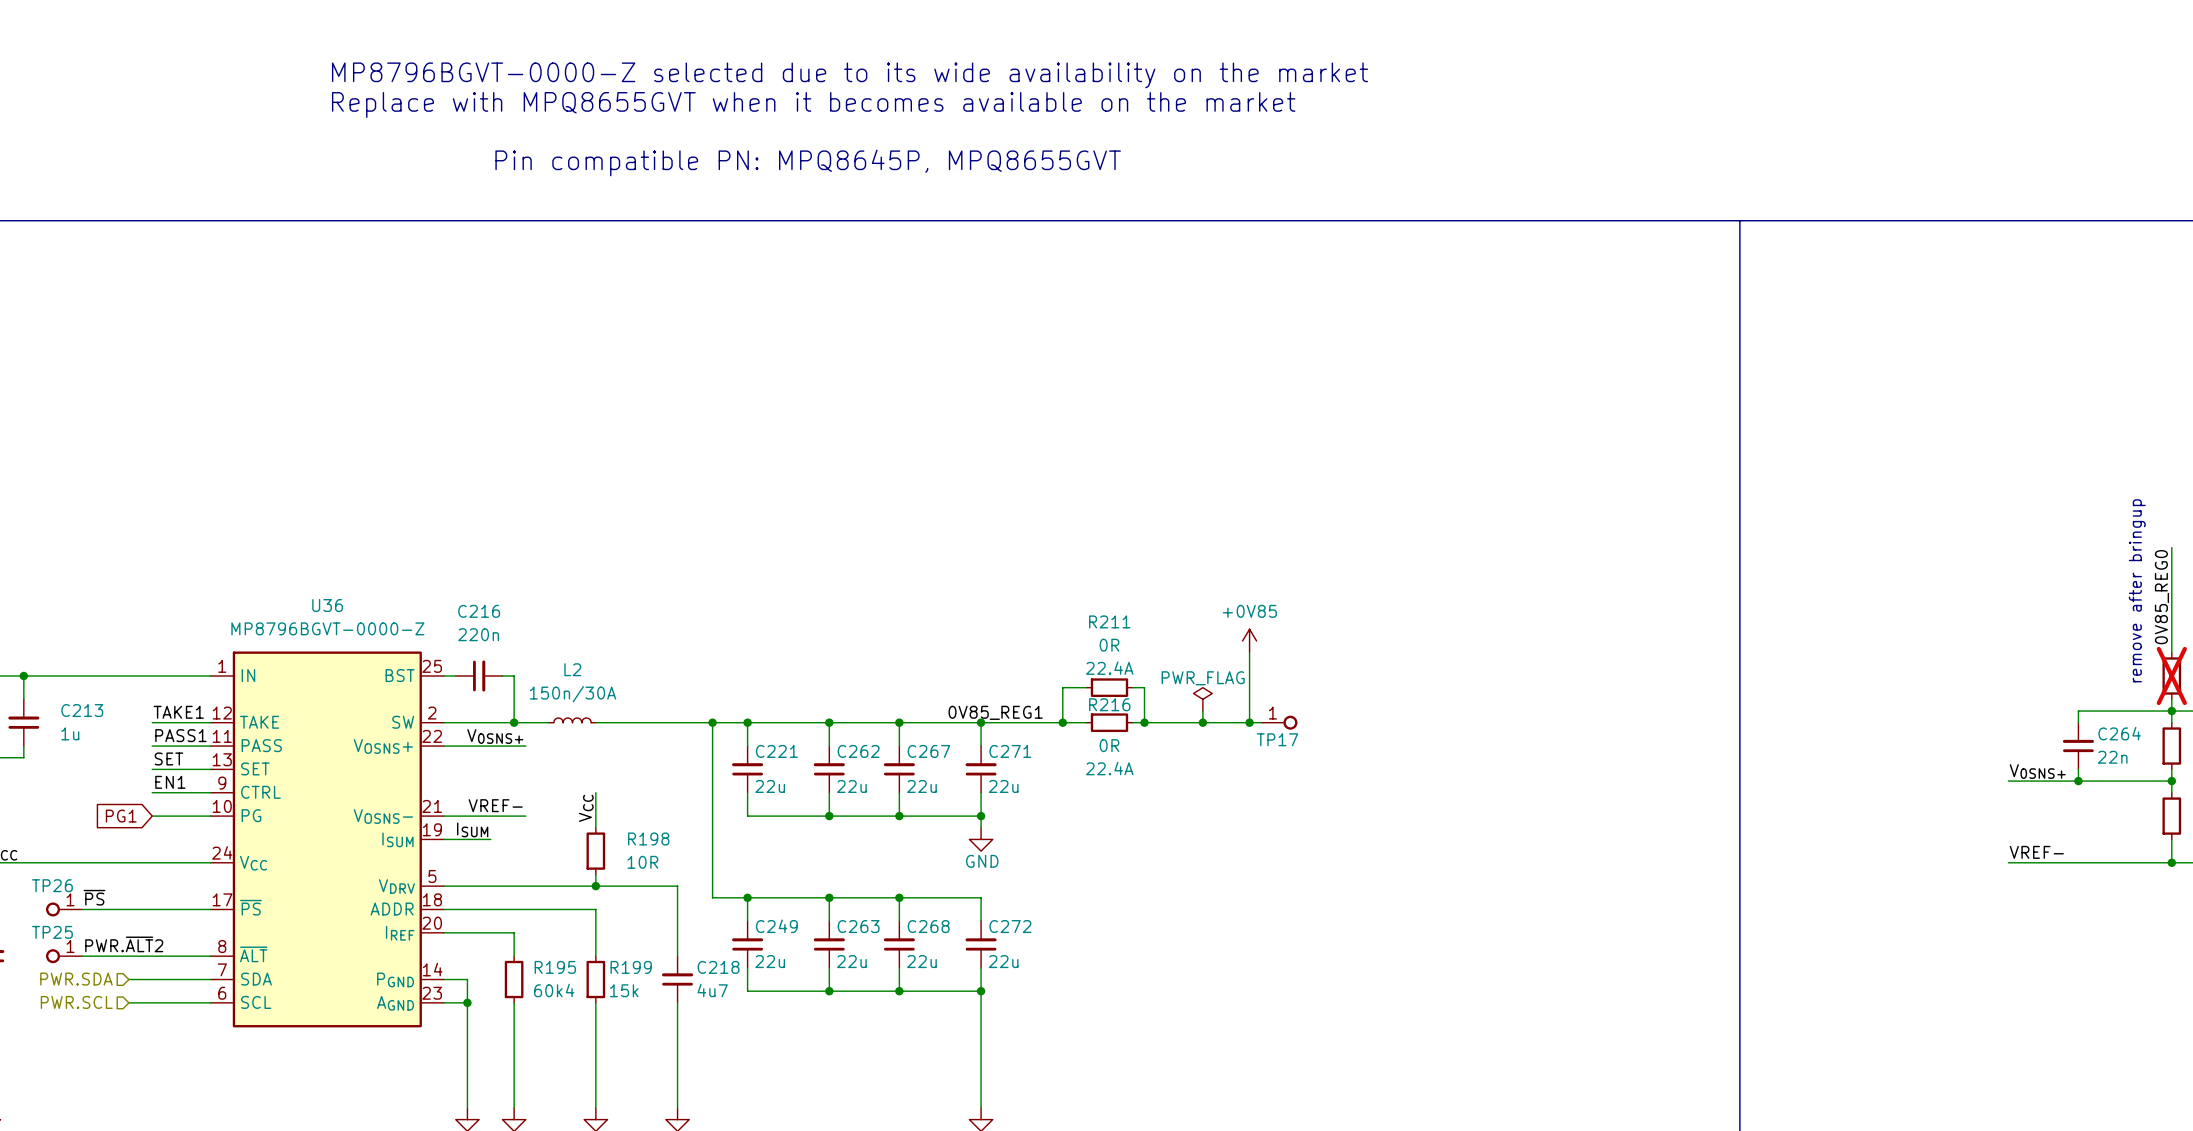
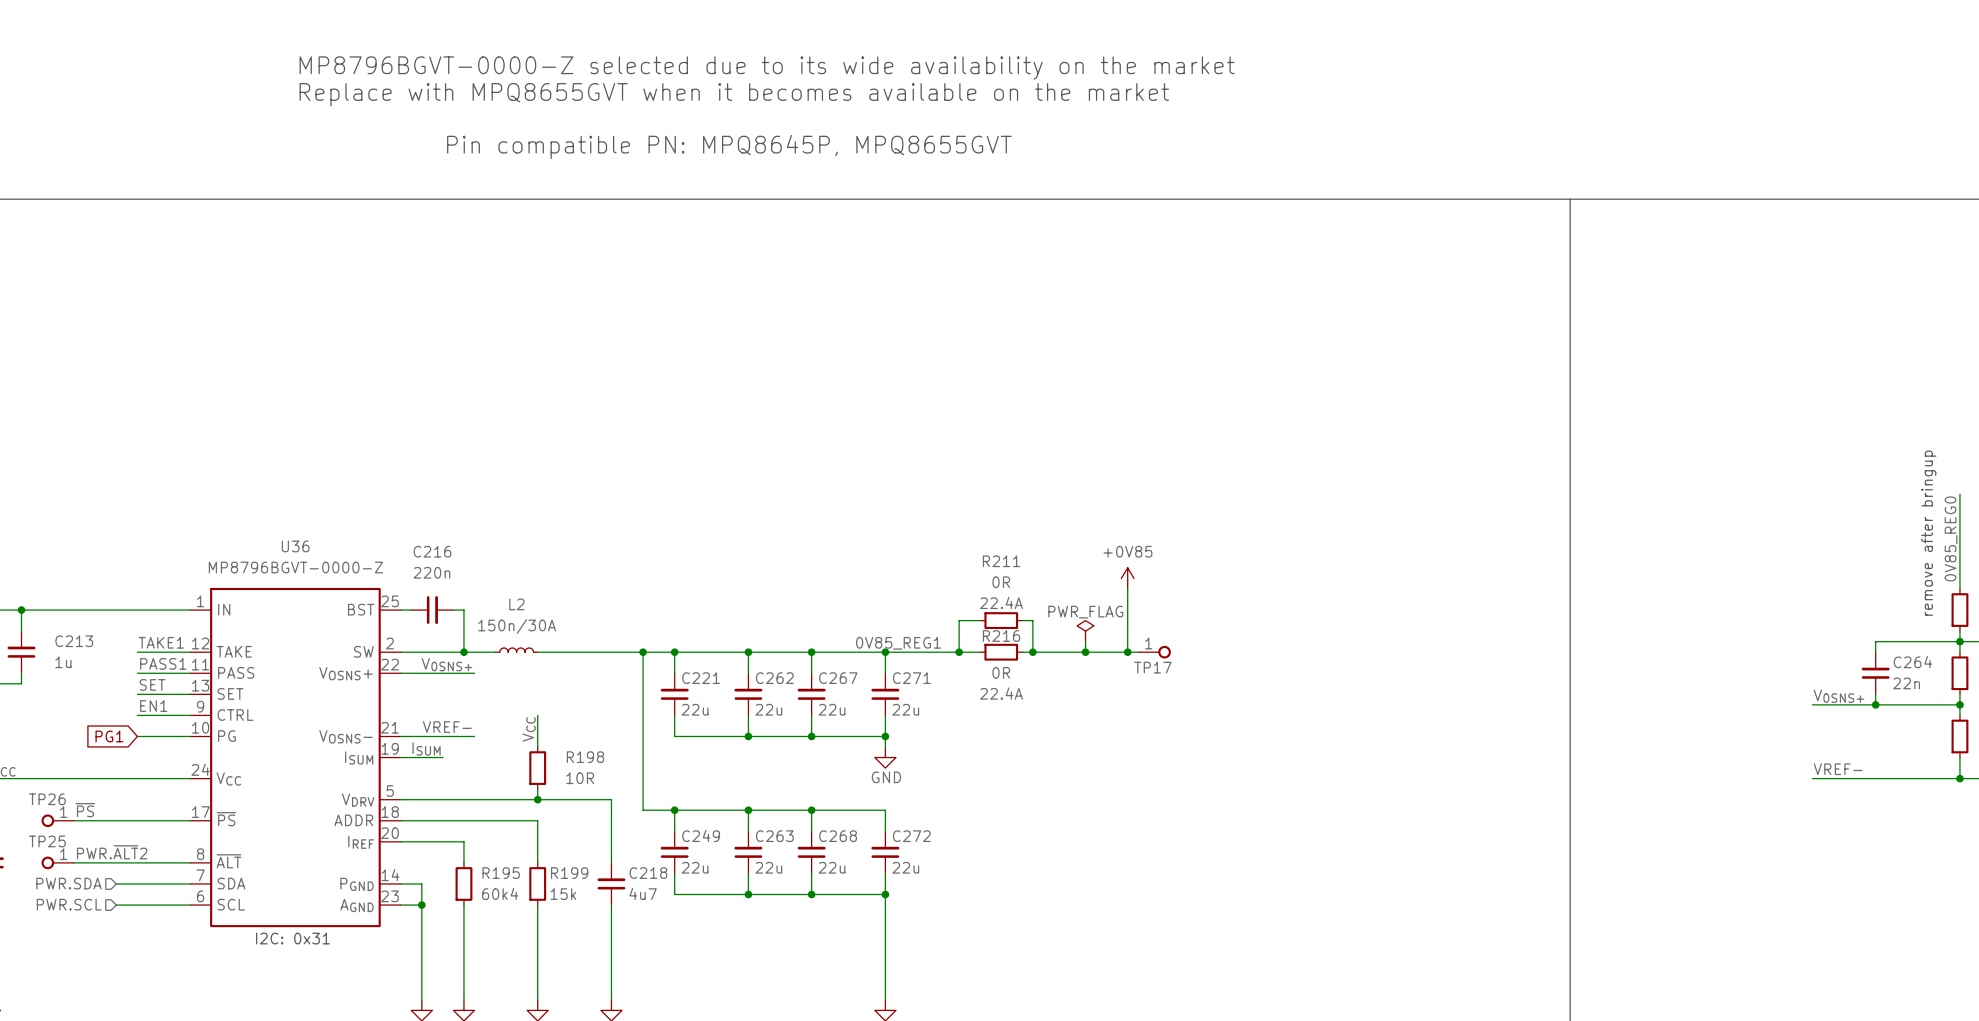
part do-not-place cross: (2171, 676) -> none
text: none -> I2C: 0x31 (292, 938)

